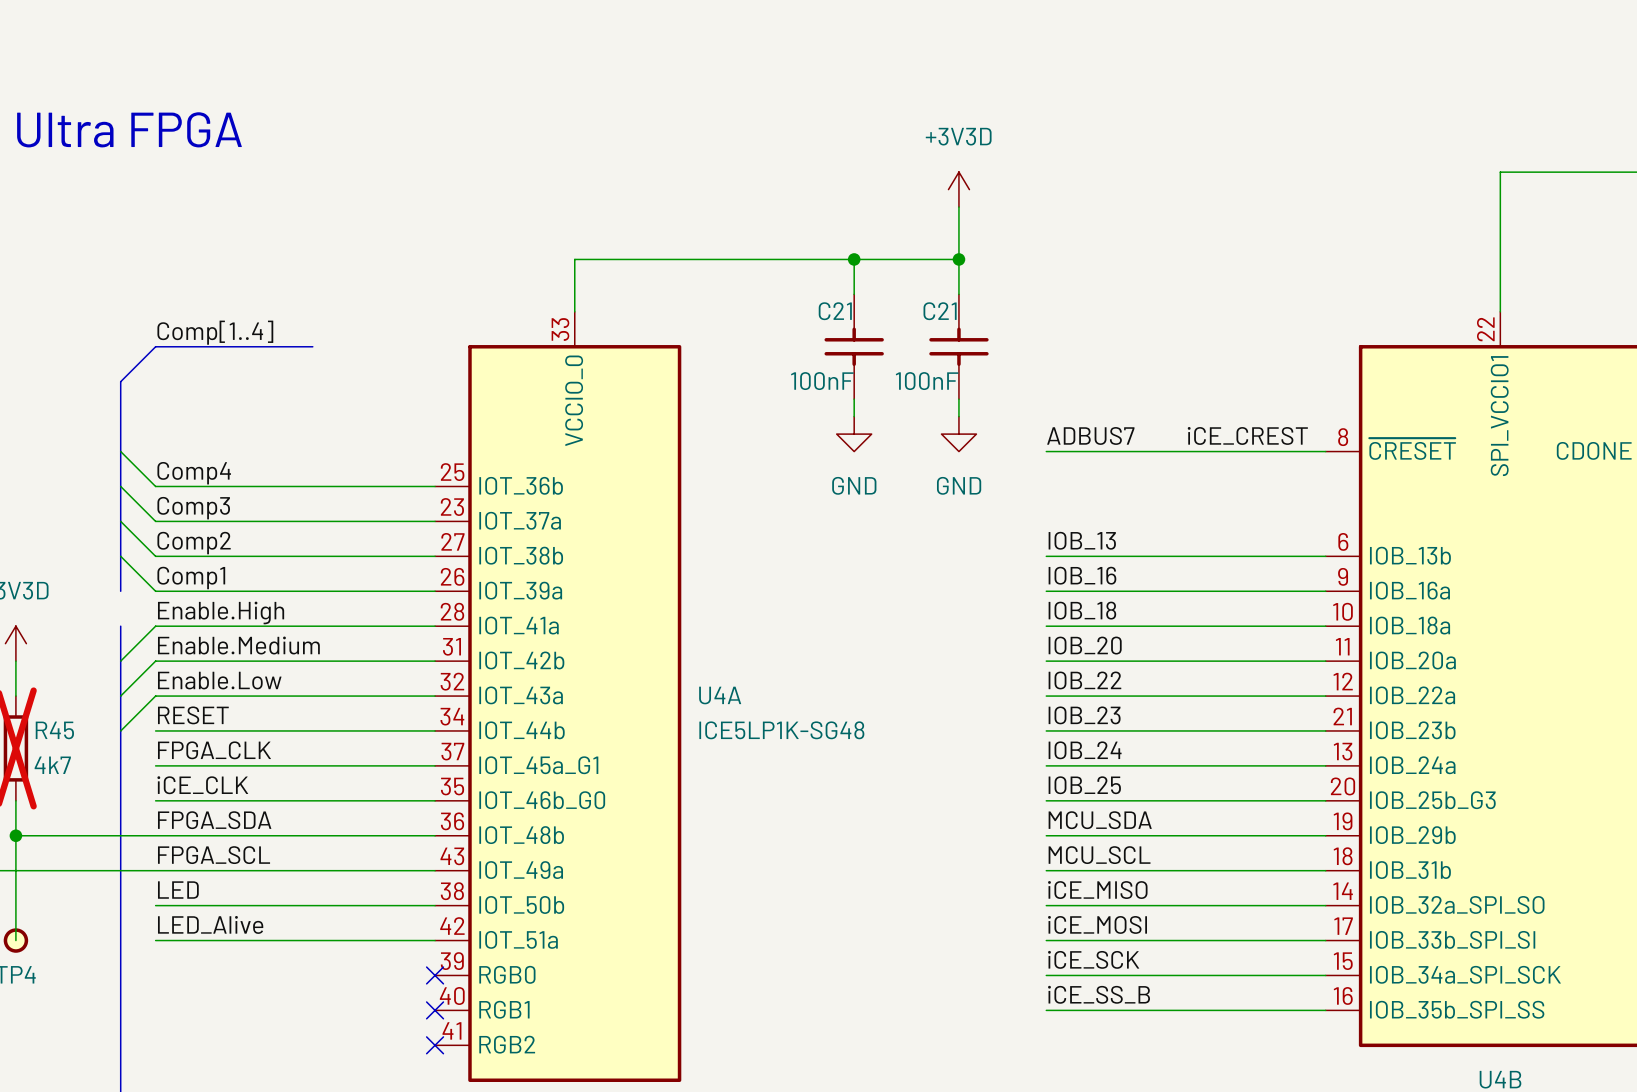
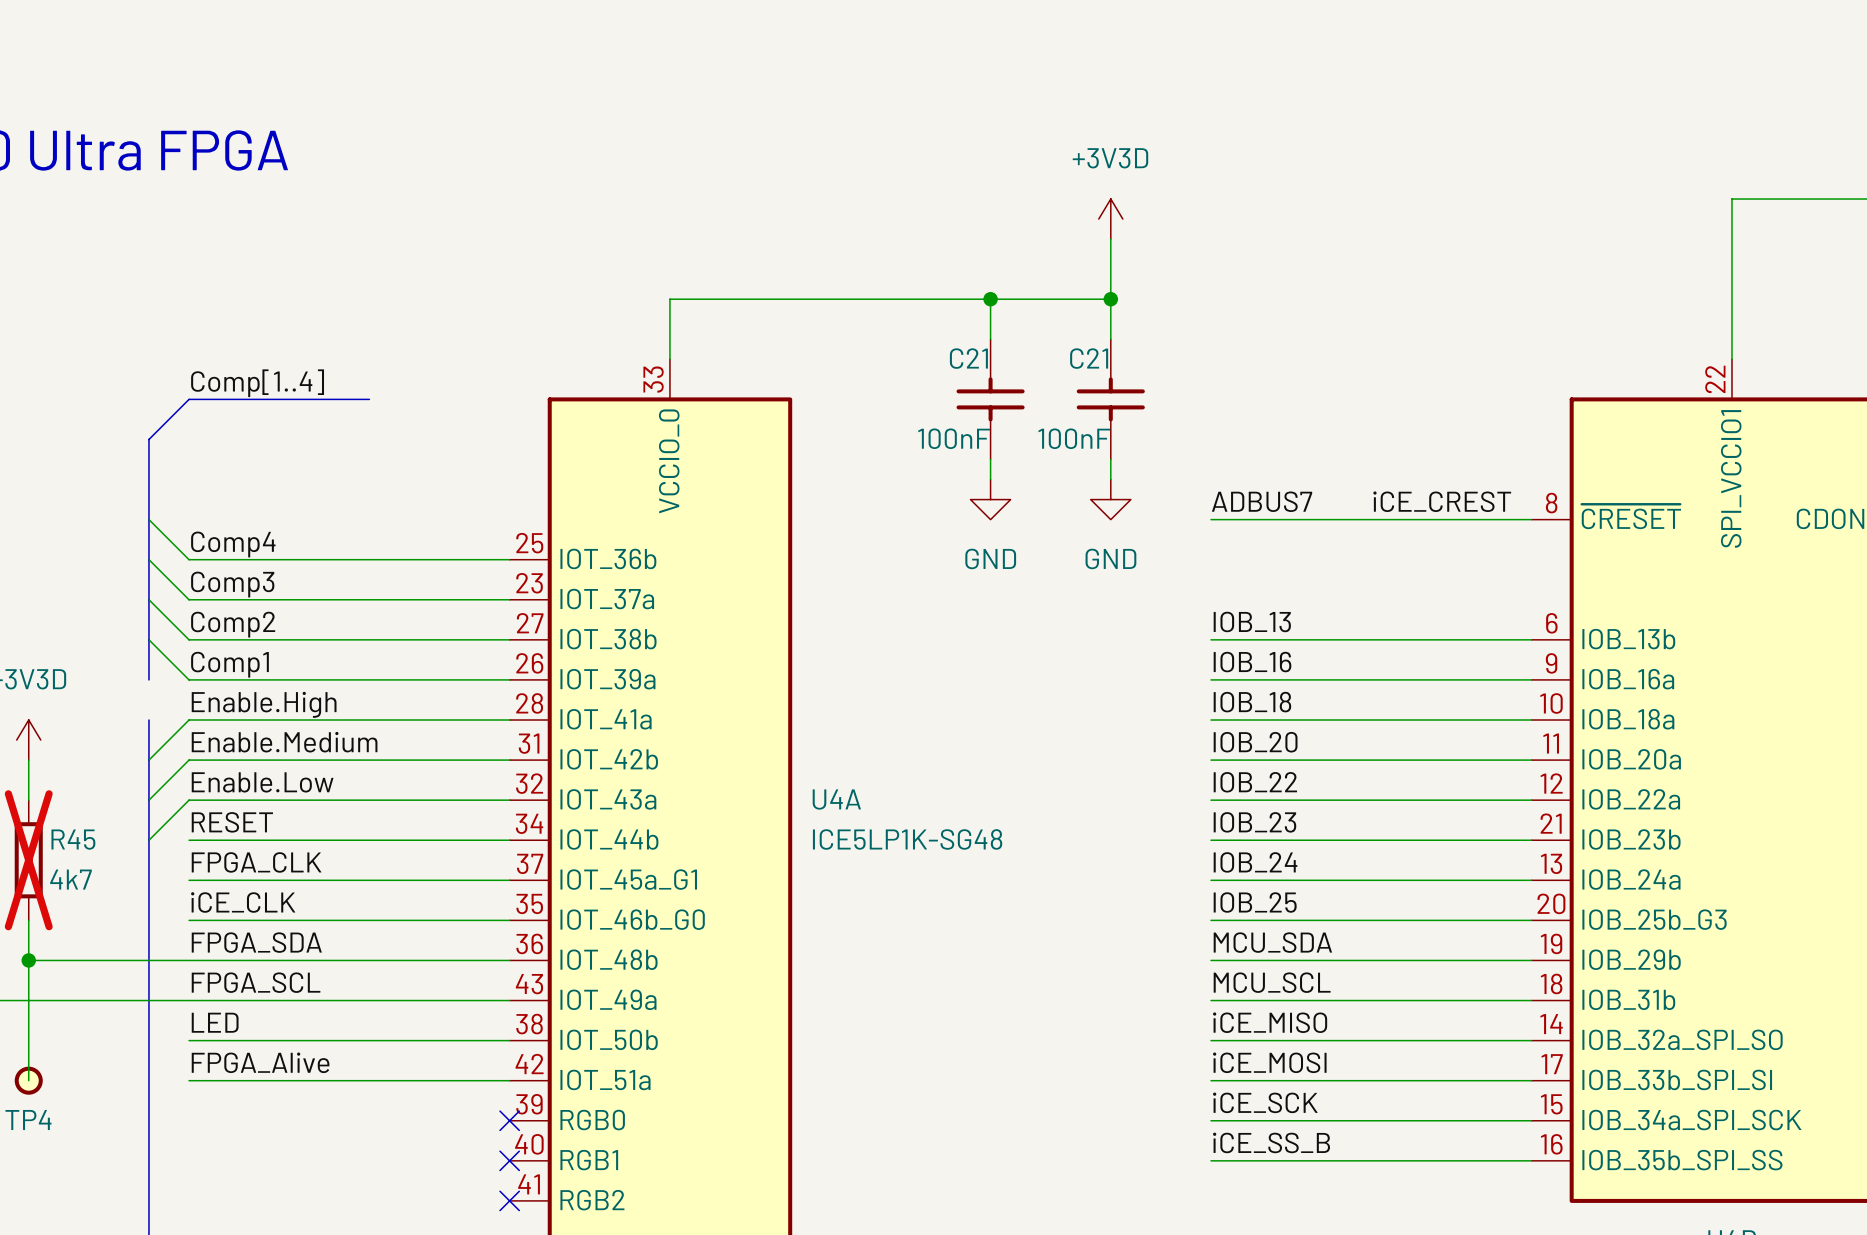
label: LED_Alive (210, 924) -> FPGA_Alive (260, 1062)

